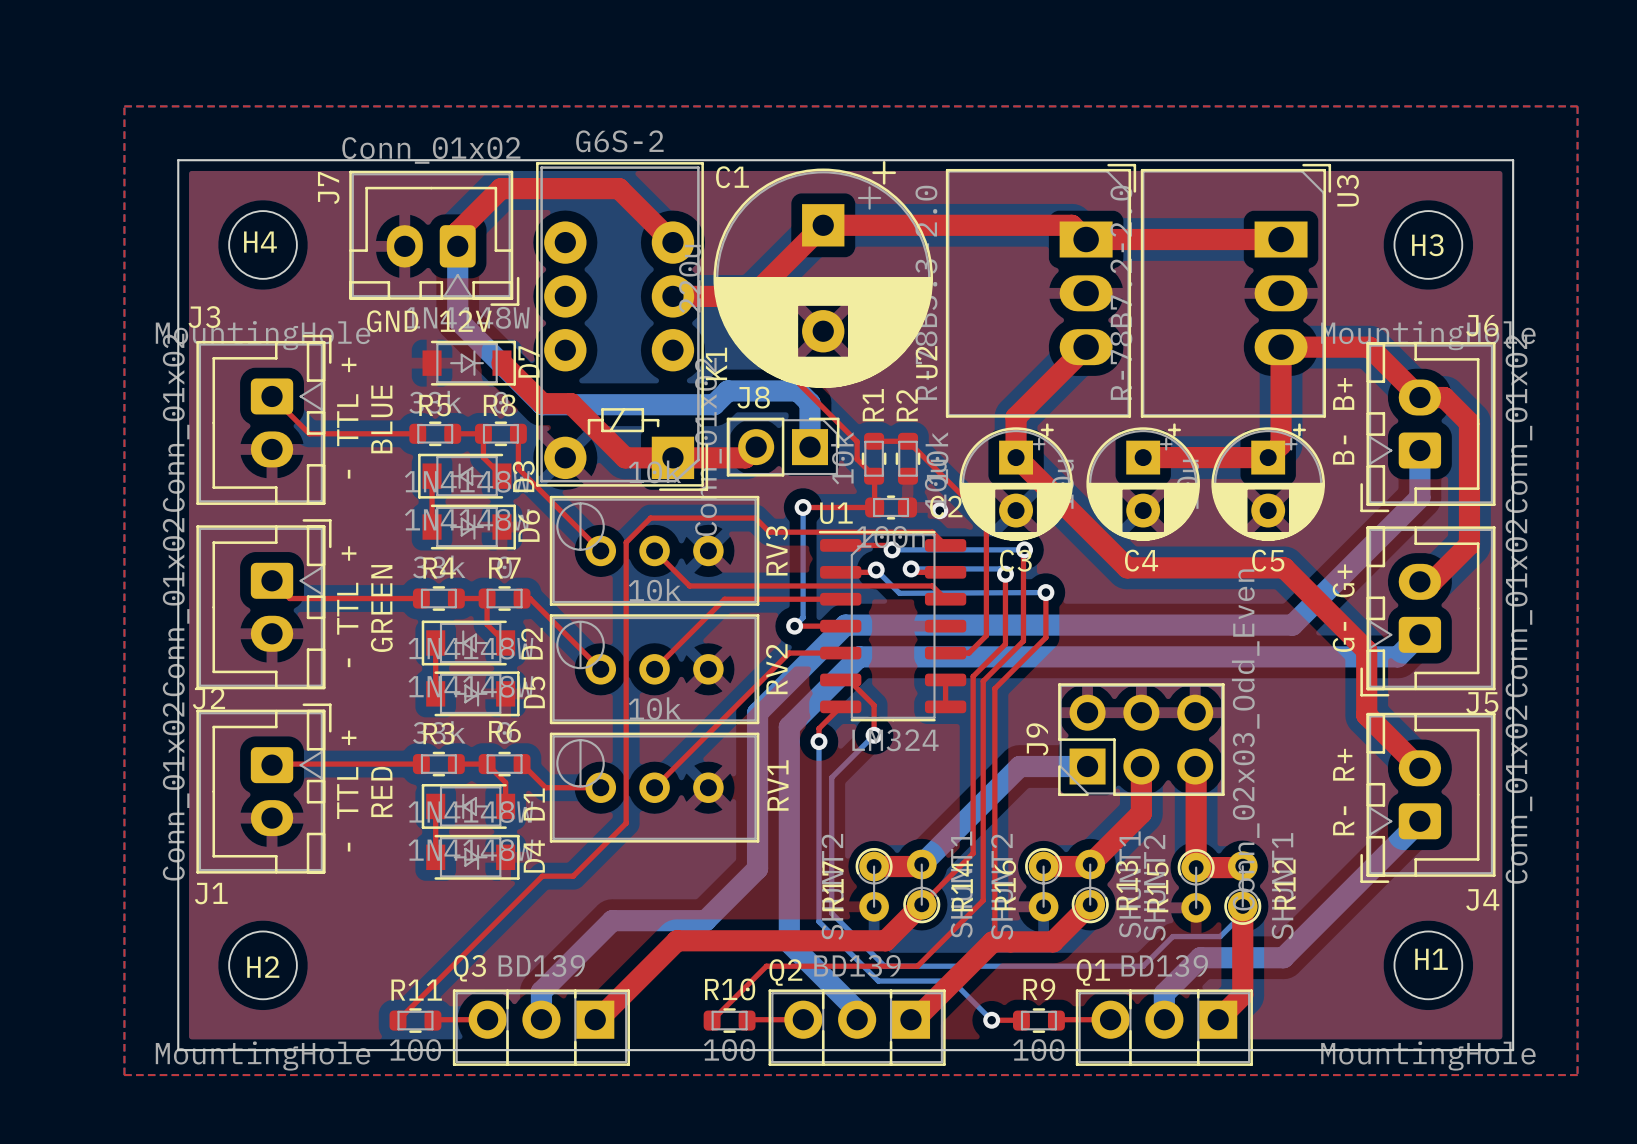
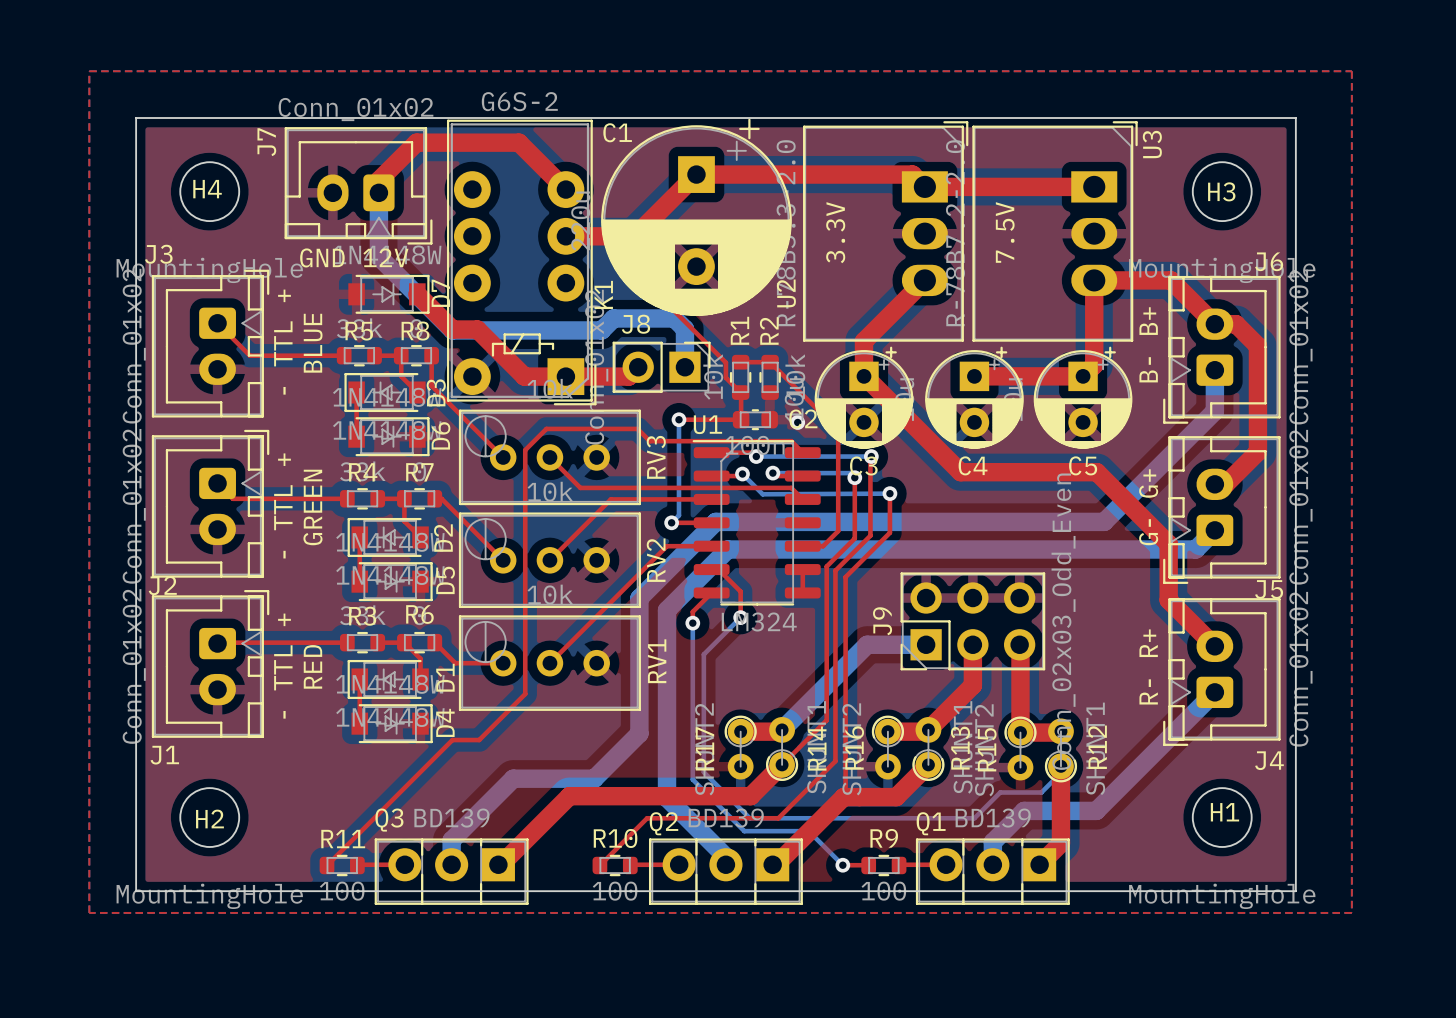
text: none -> 7.5V (1005, 232)
text: none -> 3.3V (835, 232)

